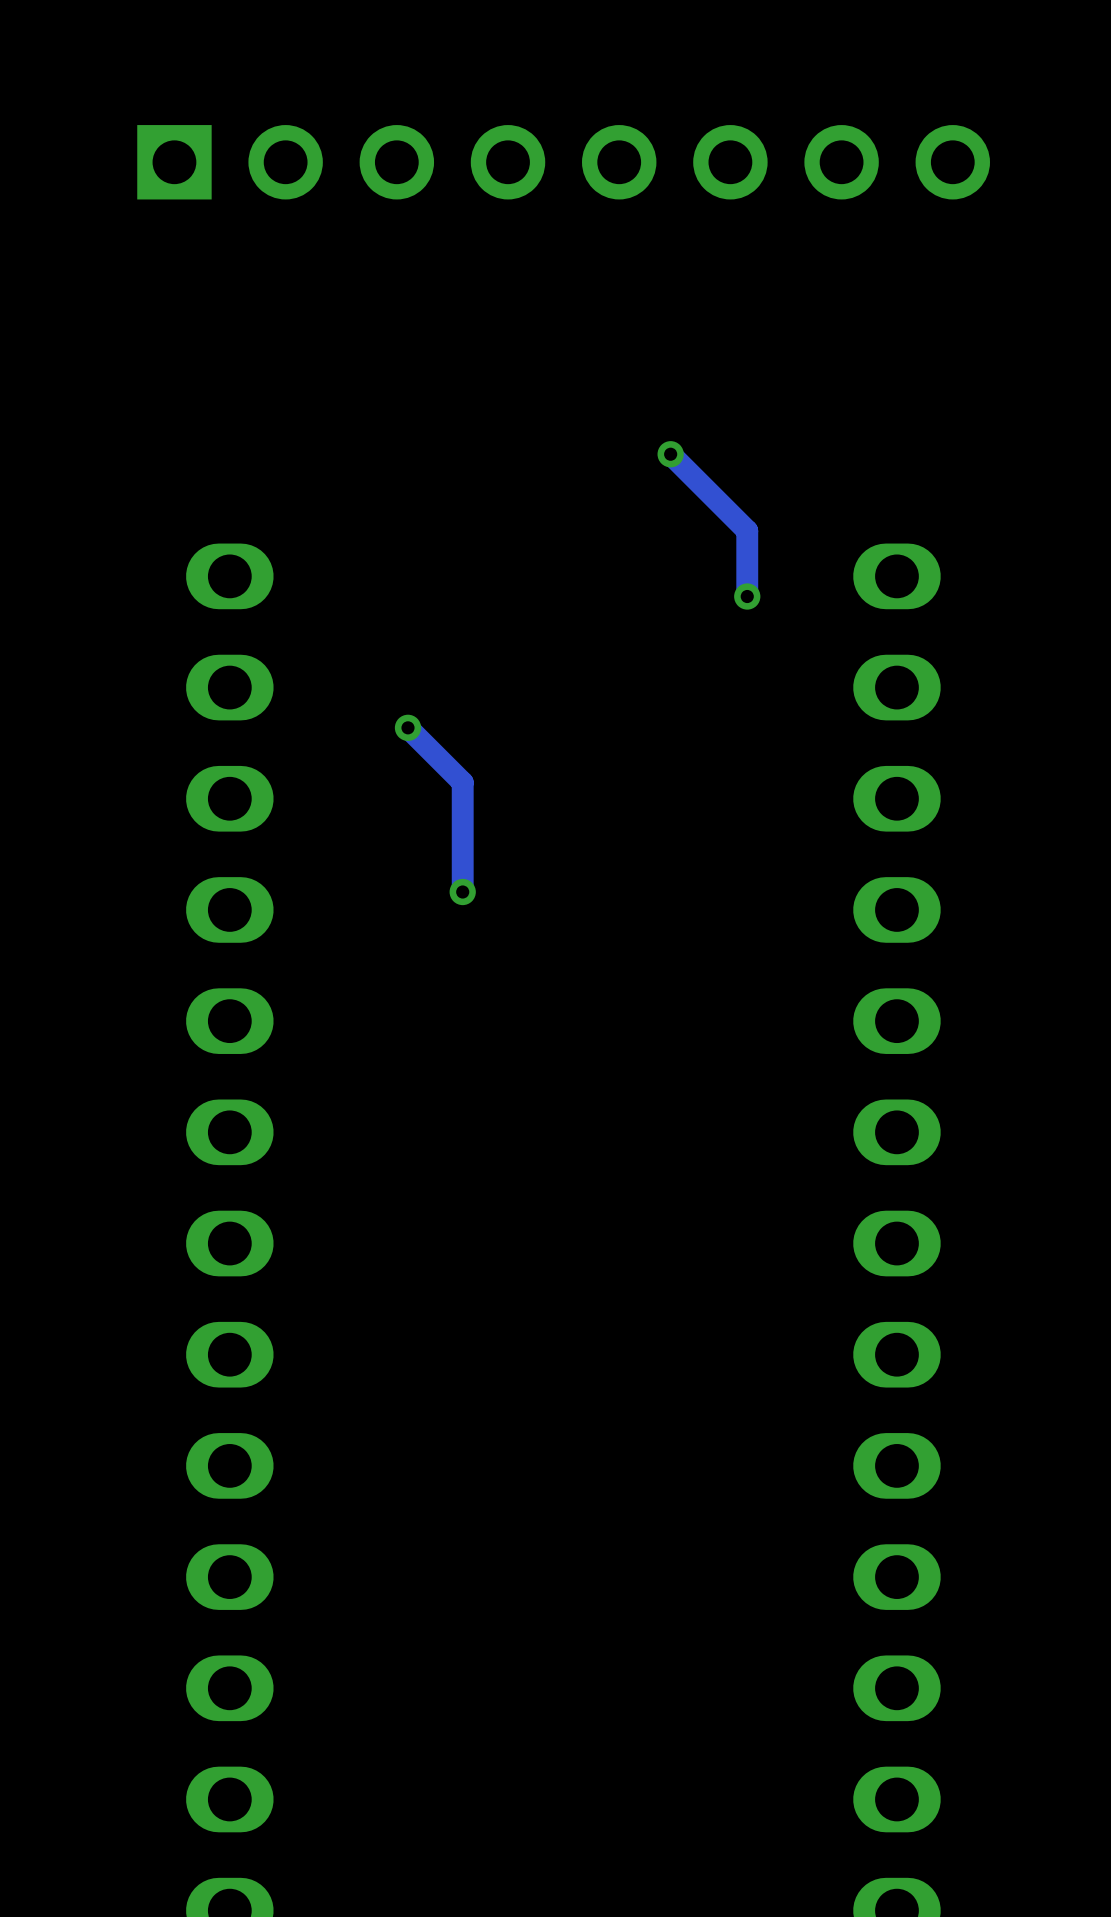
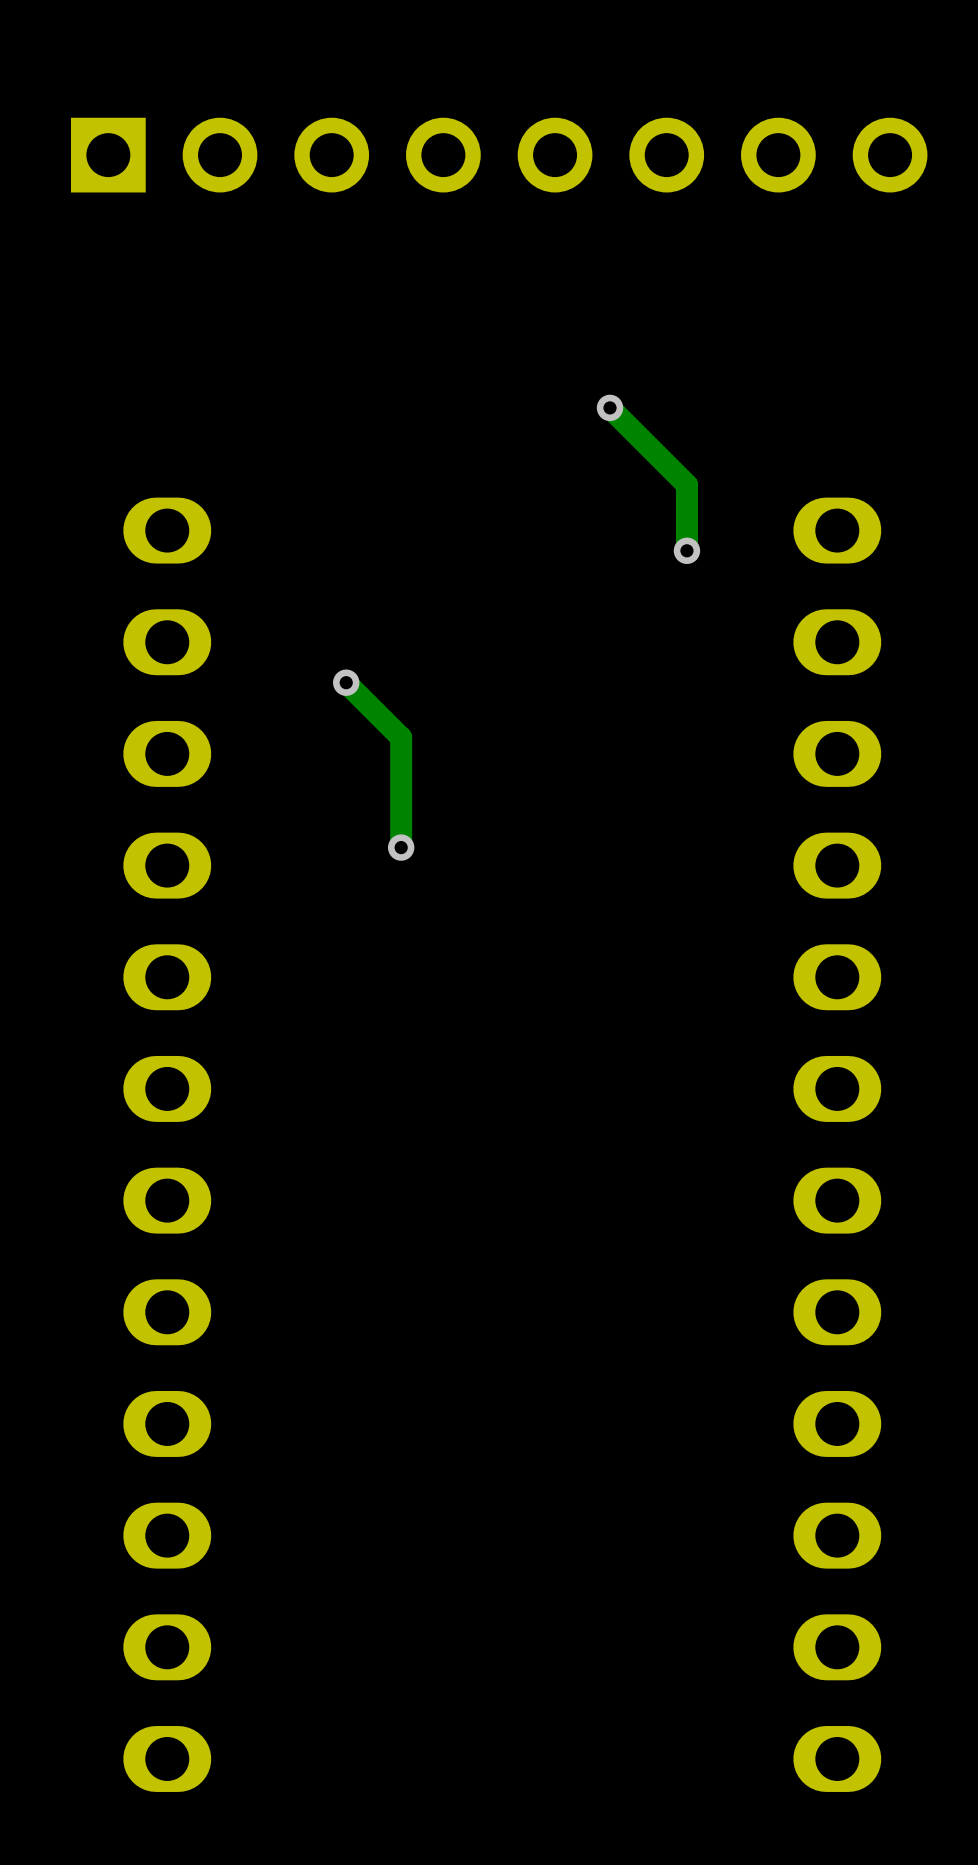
part position: (563, 162) -> (499, 155)

